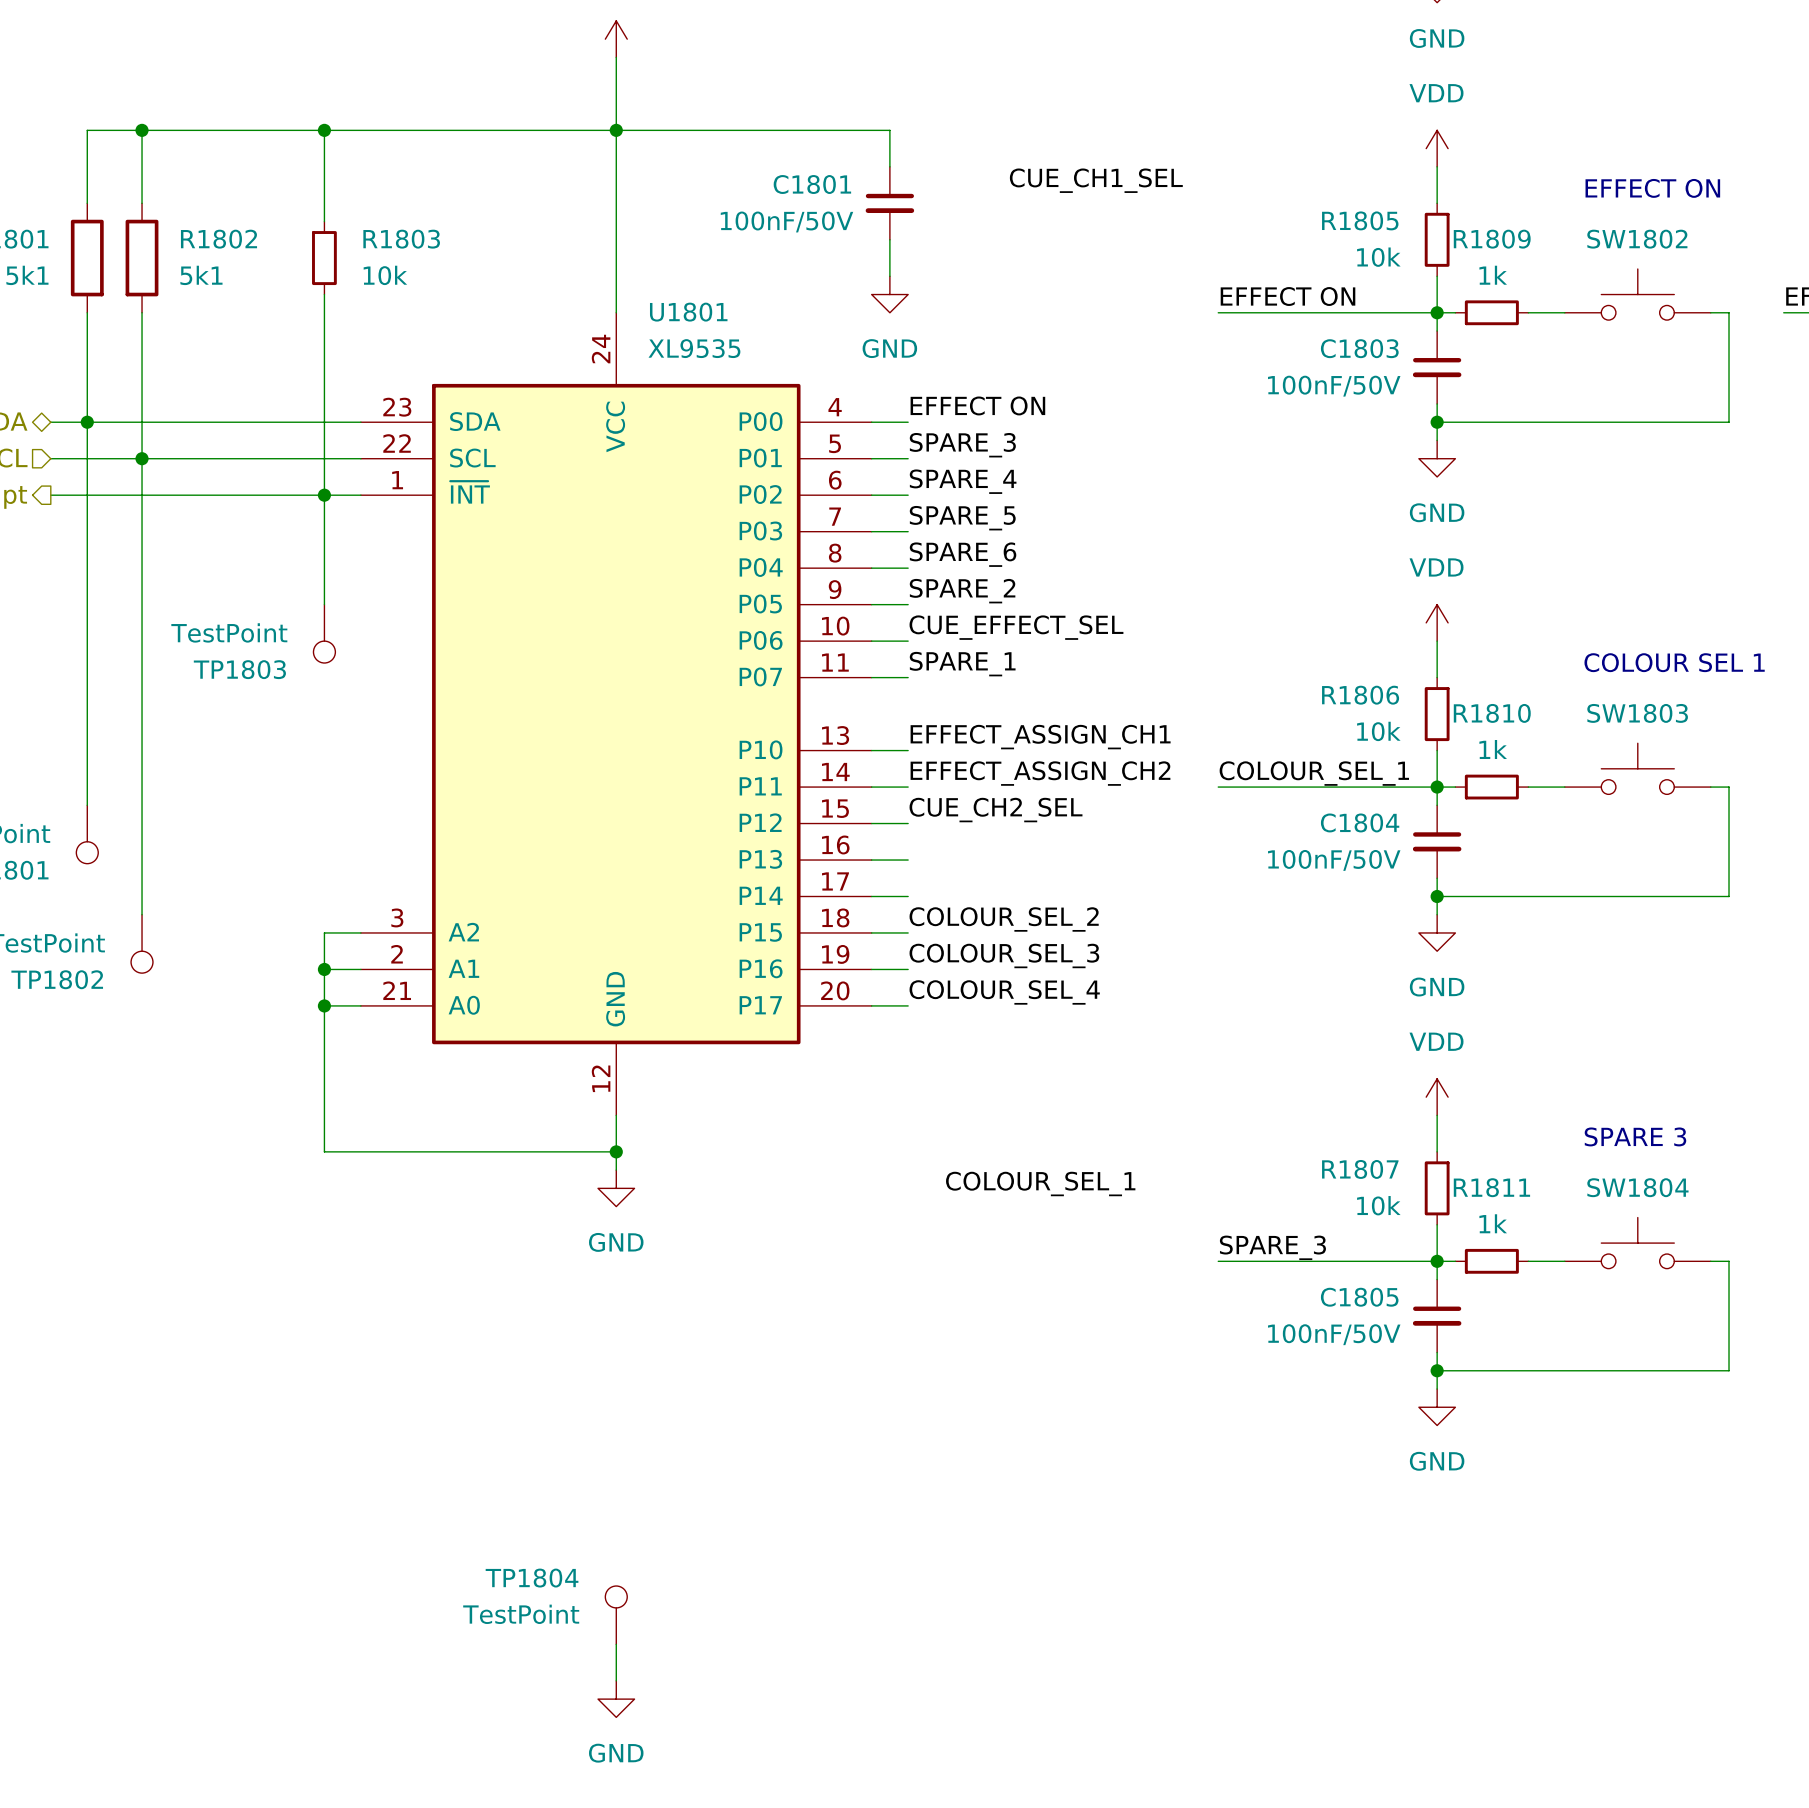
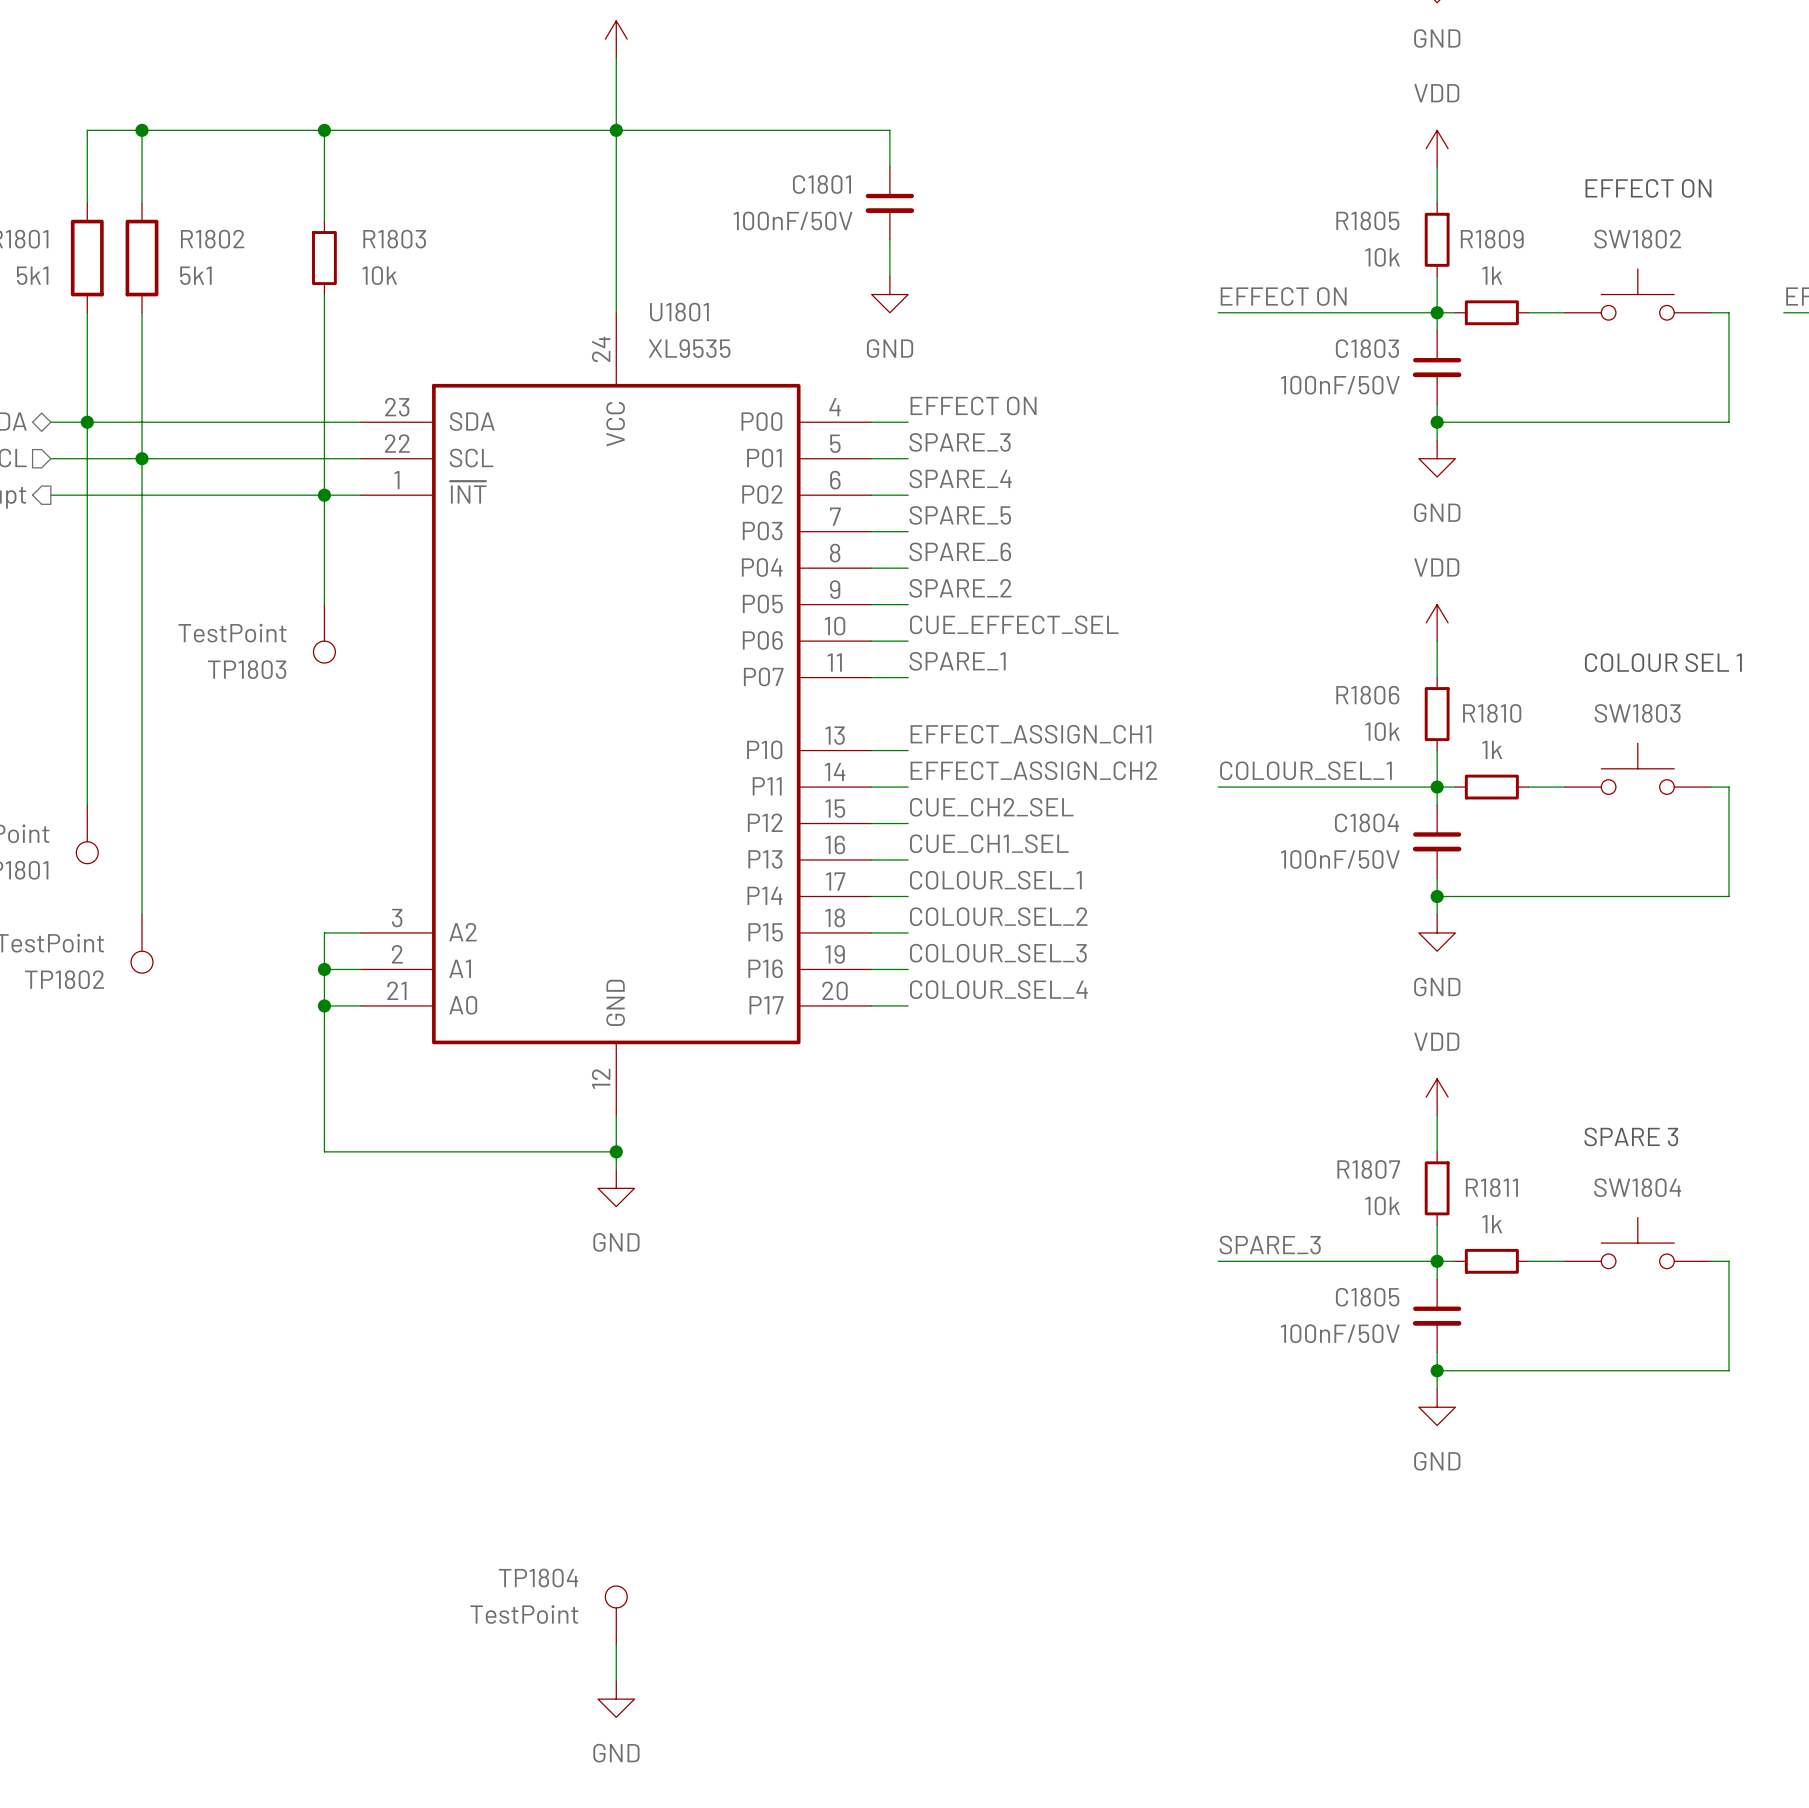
label: CUE_CH1_SEL (1096, 180) -> none
label: none -> CUE_CH1_SEL (989, 843)
label position: COLOUR_SEL_1 (1040, 1183) -> COLOUR_SEL_1 (995, 880)

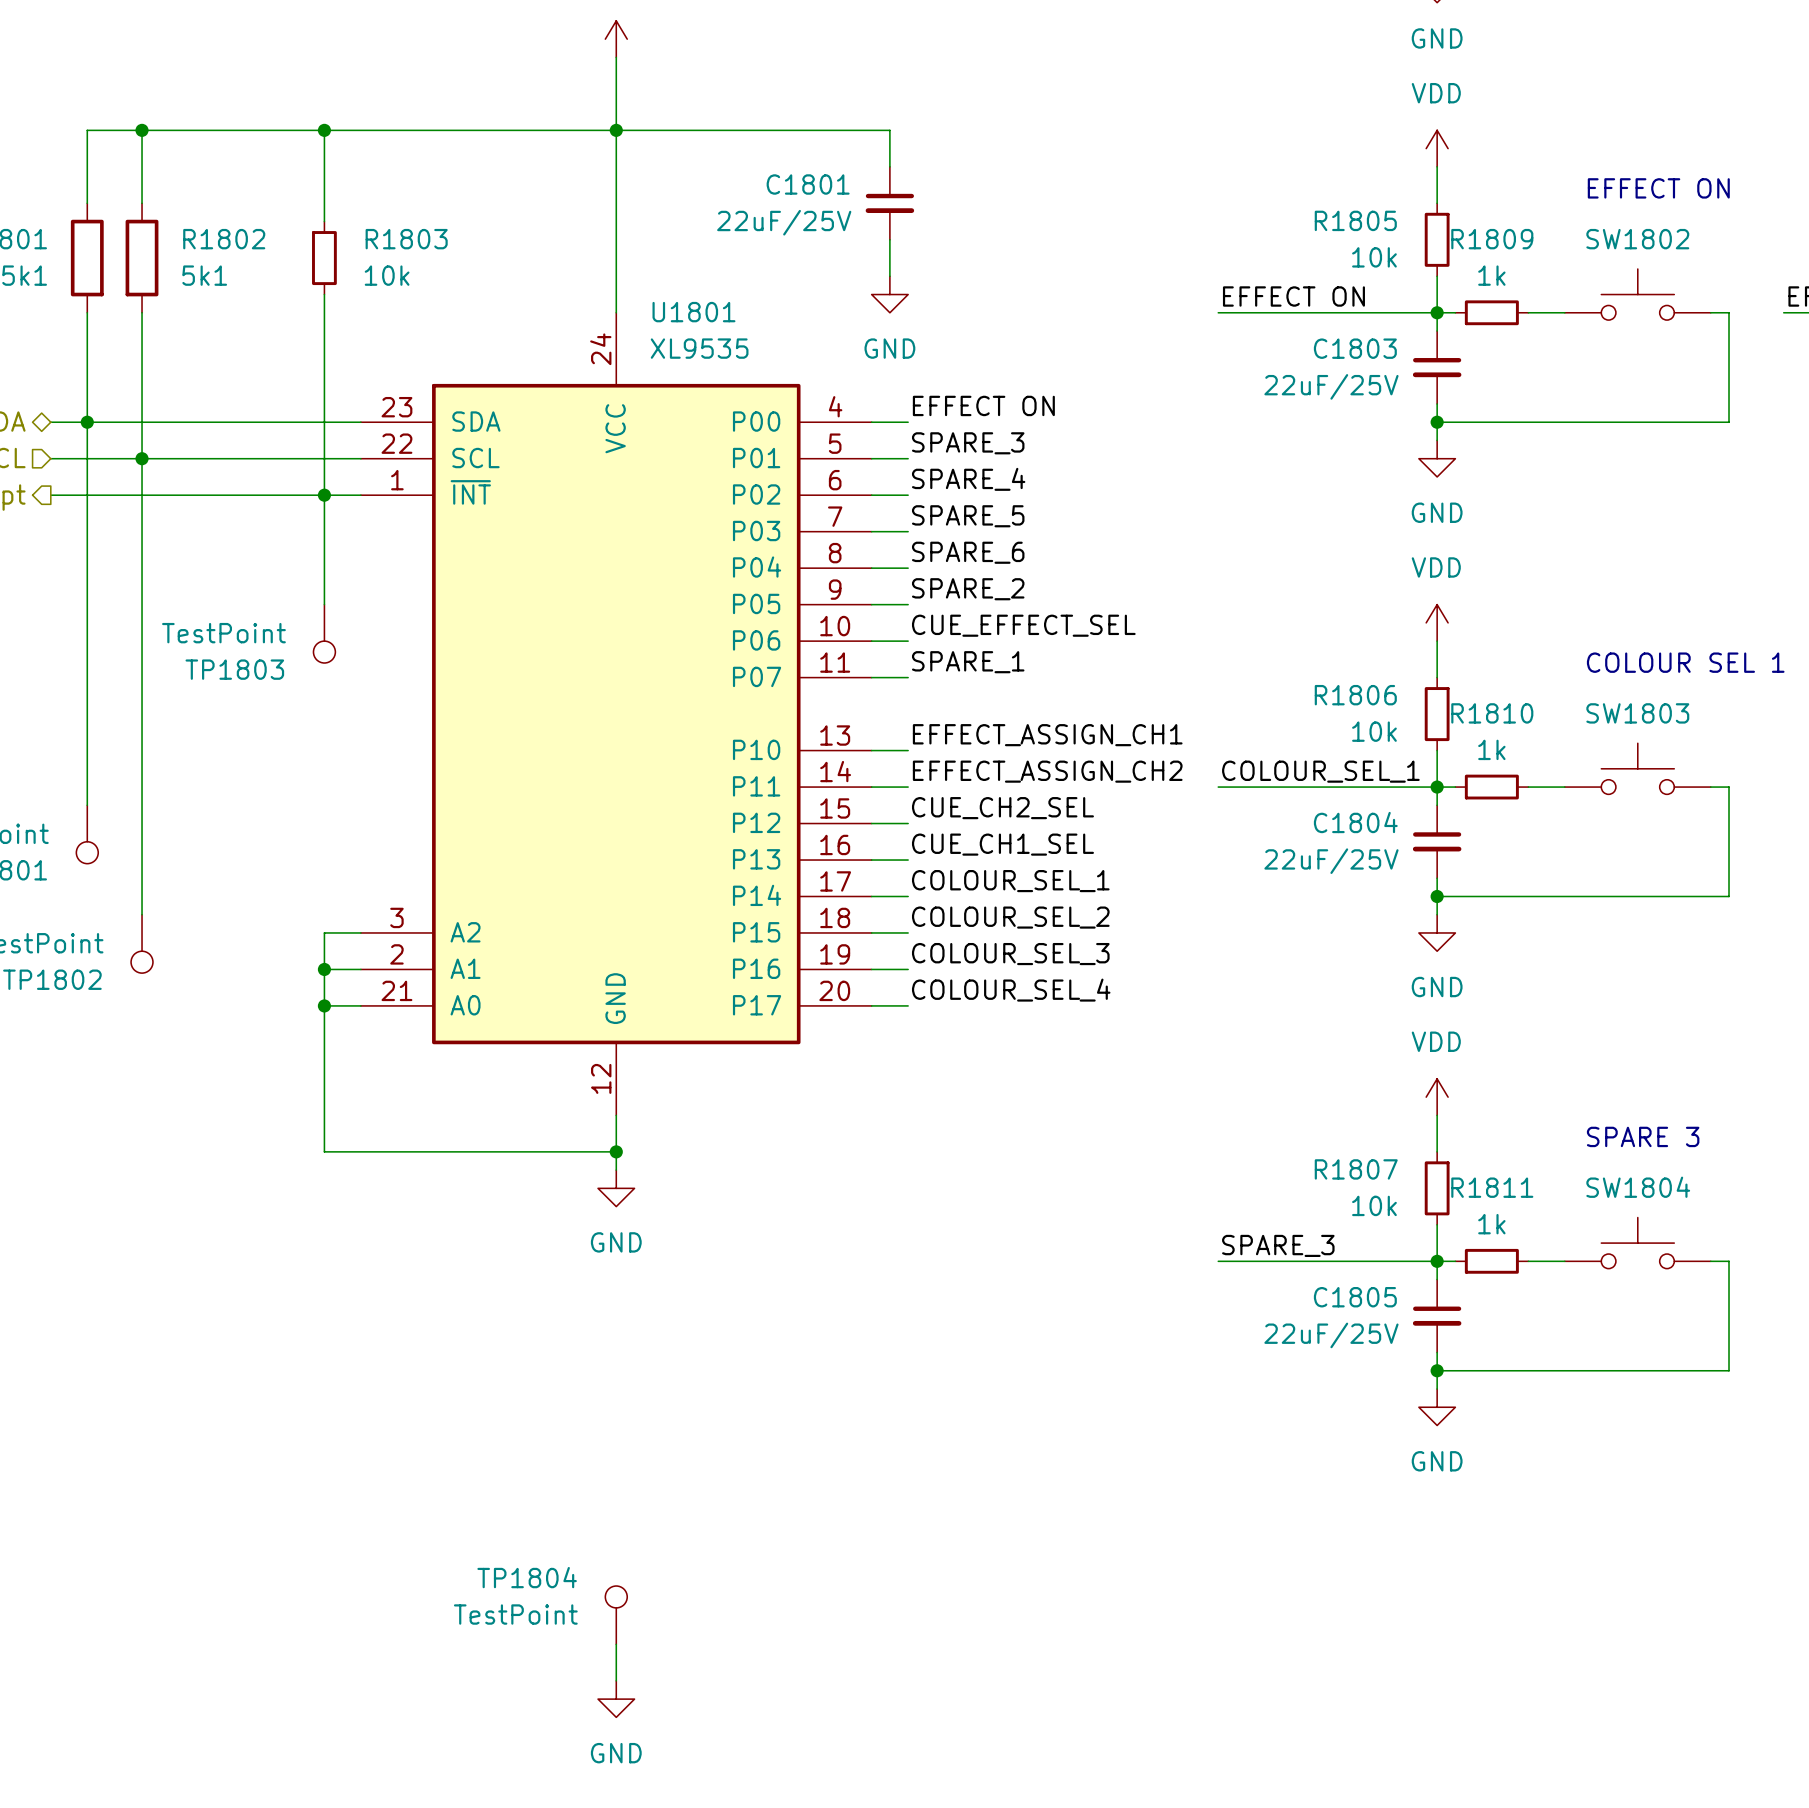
C1801 value: 100nF/50V (793, 220) -> 22uF/25V (784, 222)
C1803 value: 100nF/50V (1340, 385) -> 22uF/25V (1331, 386)
C1804 value: 100nF/50V (1340, 859) -> 22uF/25V (1331, 861)
C1805 value: 100nF/50V (1340, 1333) -> 22uF/25V (1331, 1335)

